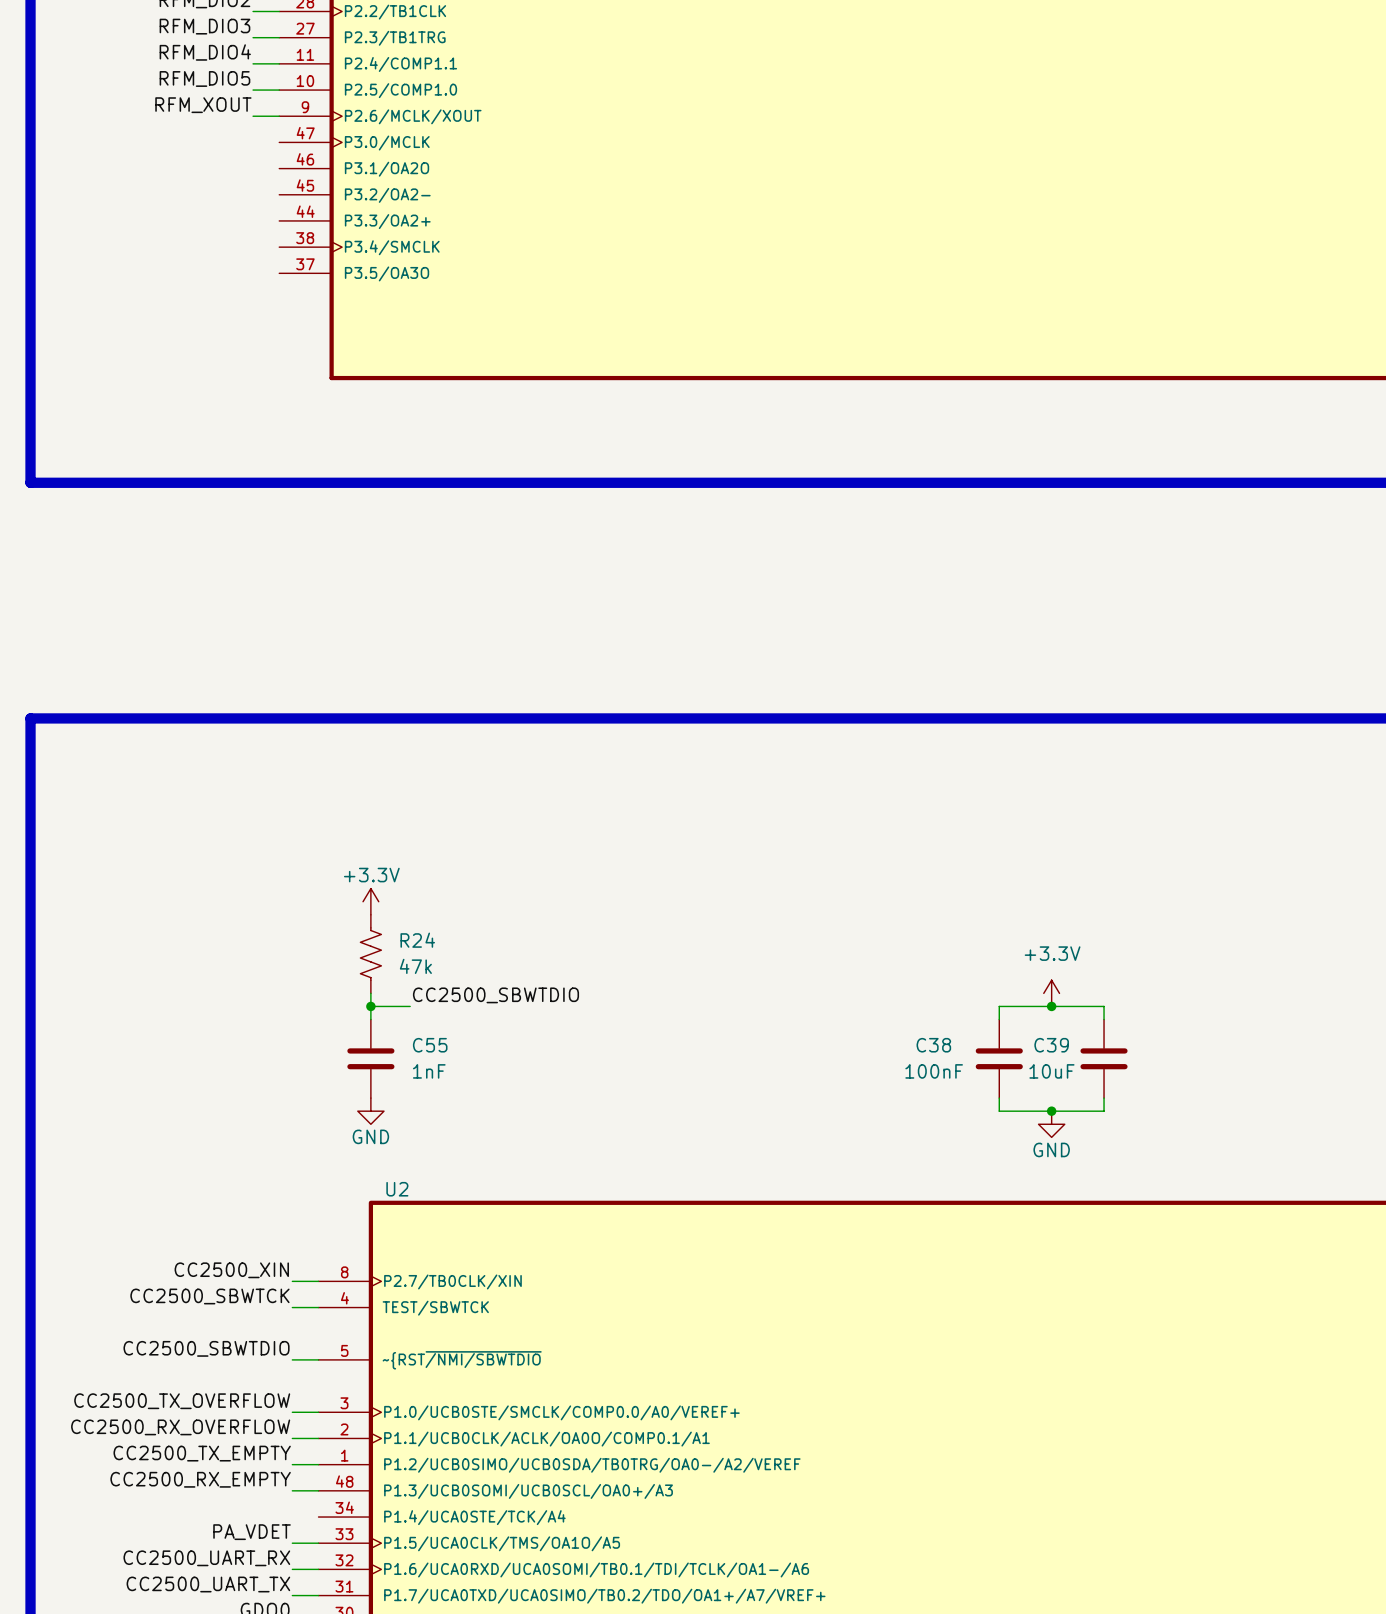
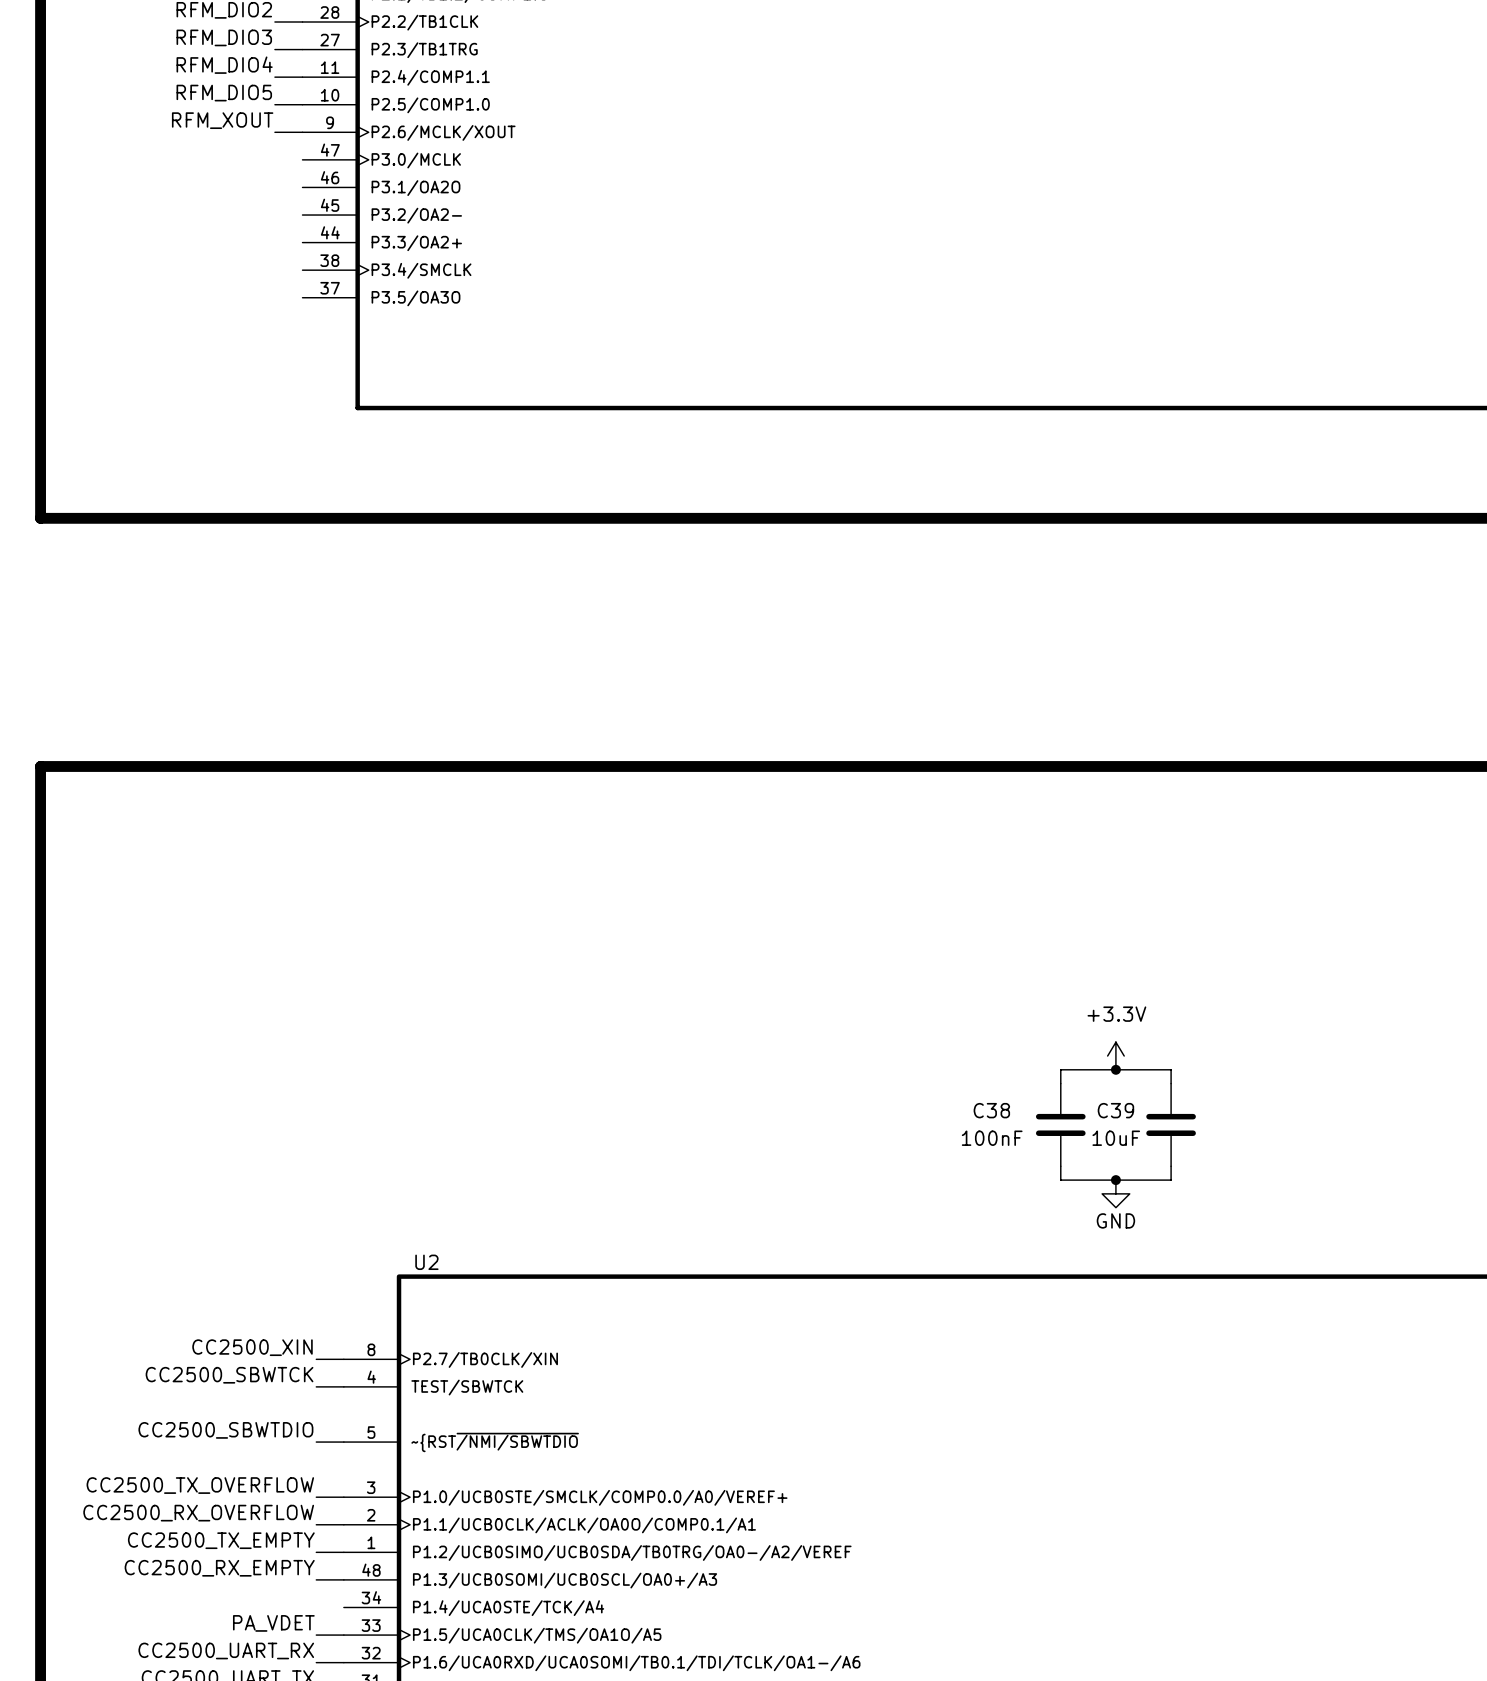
power symbol: +3.3V (370, 901) -> none
R24: 47k (370, 954) -> none
wire: (370, 993) (370, 1019) -> none
label: CC2500_SBWTDIO (495, 995) -> none
wire: (370, 1006) (410, 1006) -> none
junction: (370, 1006) -> none
C55: 1nF (370, 1058) -> none
power symbol: GND (370, 1111) -> none

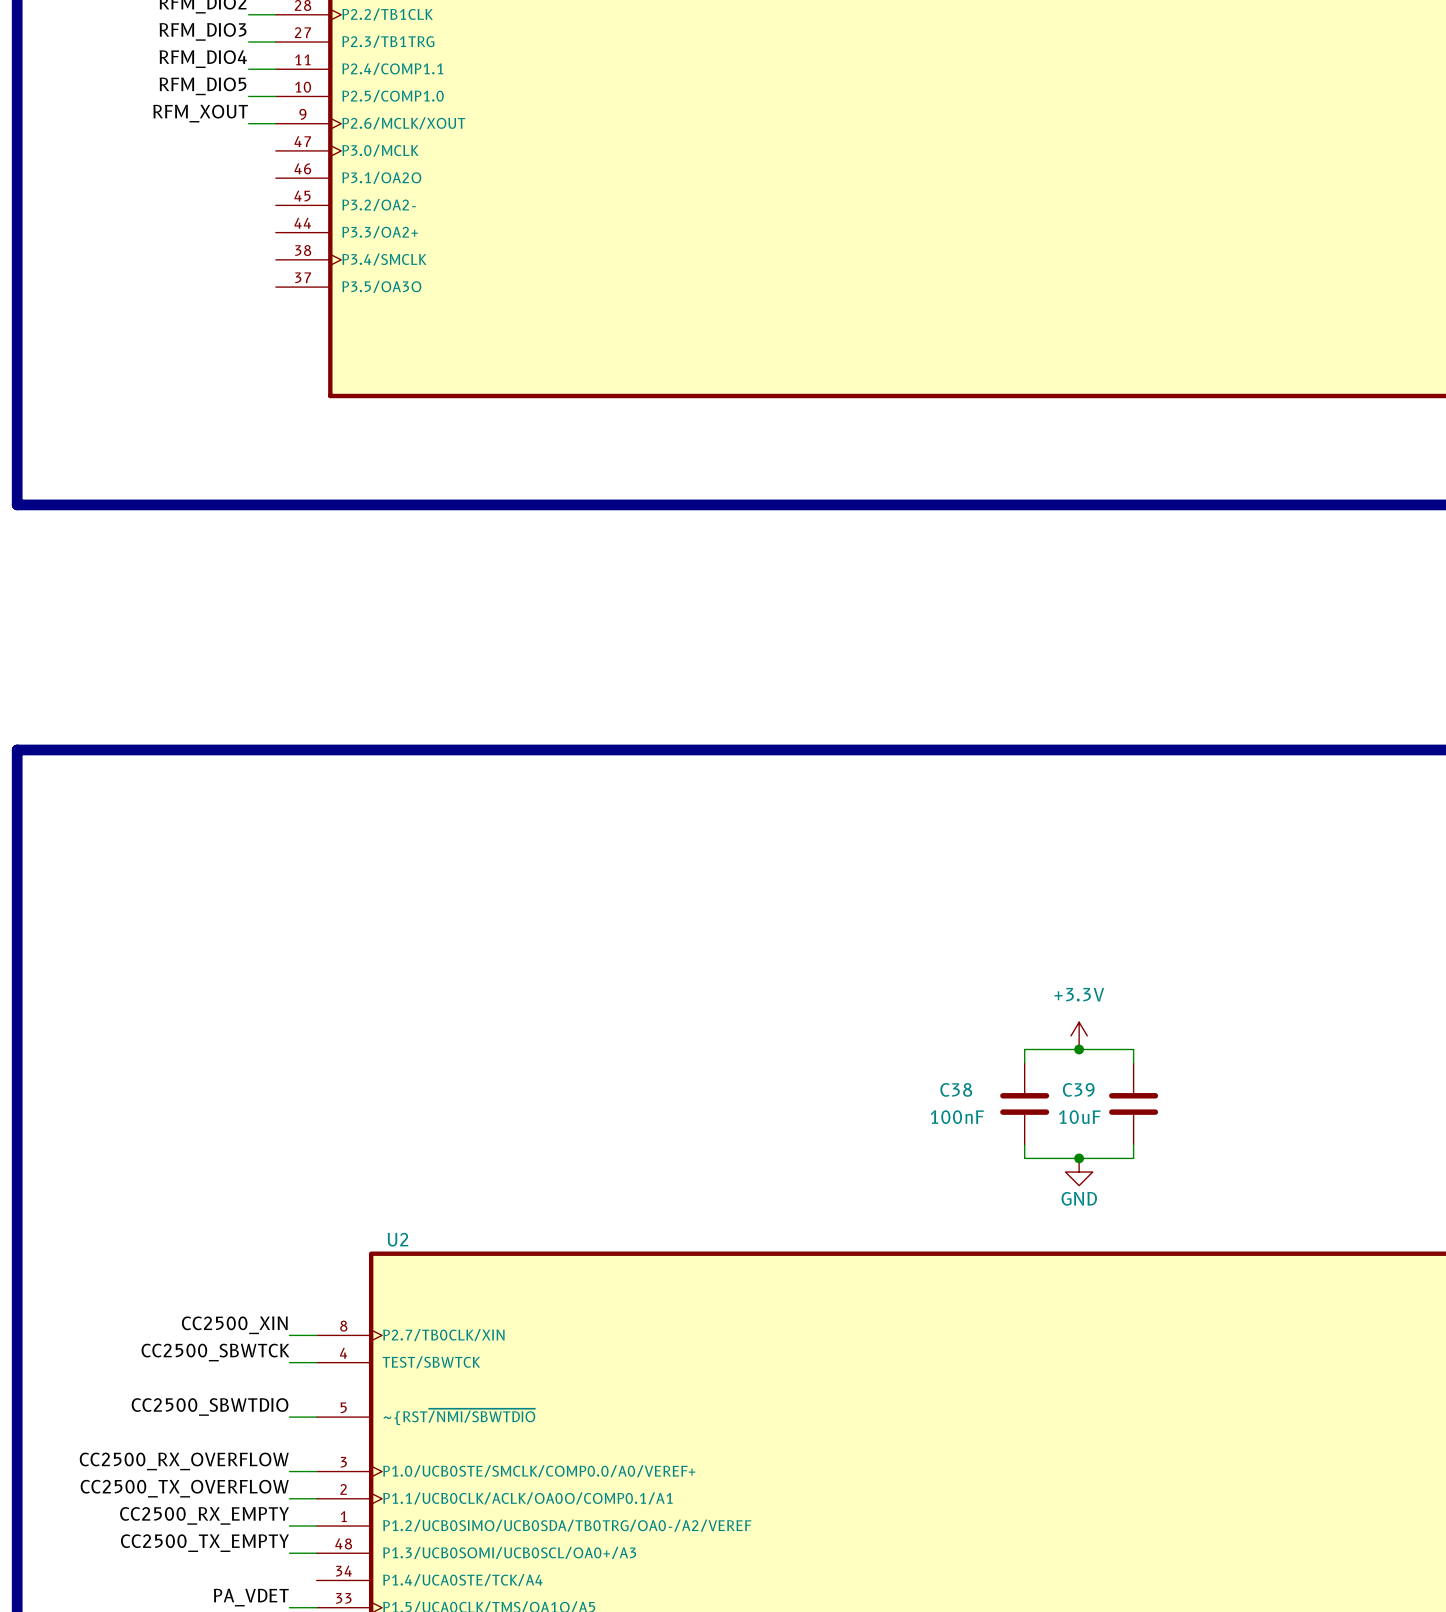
label: CC2500_TX_OVERFLOW (200, 1485) -> CC2500_RX_OVERFLOW (184, 1461)
label: CC2500_RX_OVERFLOW (198, 1513) -> CC2500_TX_OVERFLOW (184, 1488)
label: CC2500_TX_EMPTY (221, 1540) -> CC2500_RX_EMPTY (204, 1515)
label: CC2500_RX_EMPTY (219, 1568) -> CC2500_TX_EMPTY (204, 1543)

